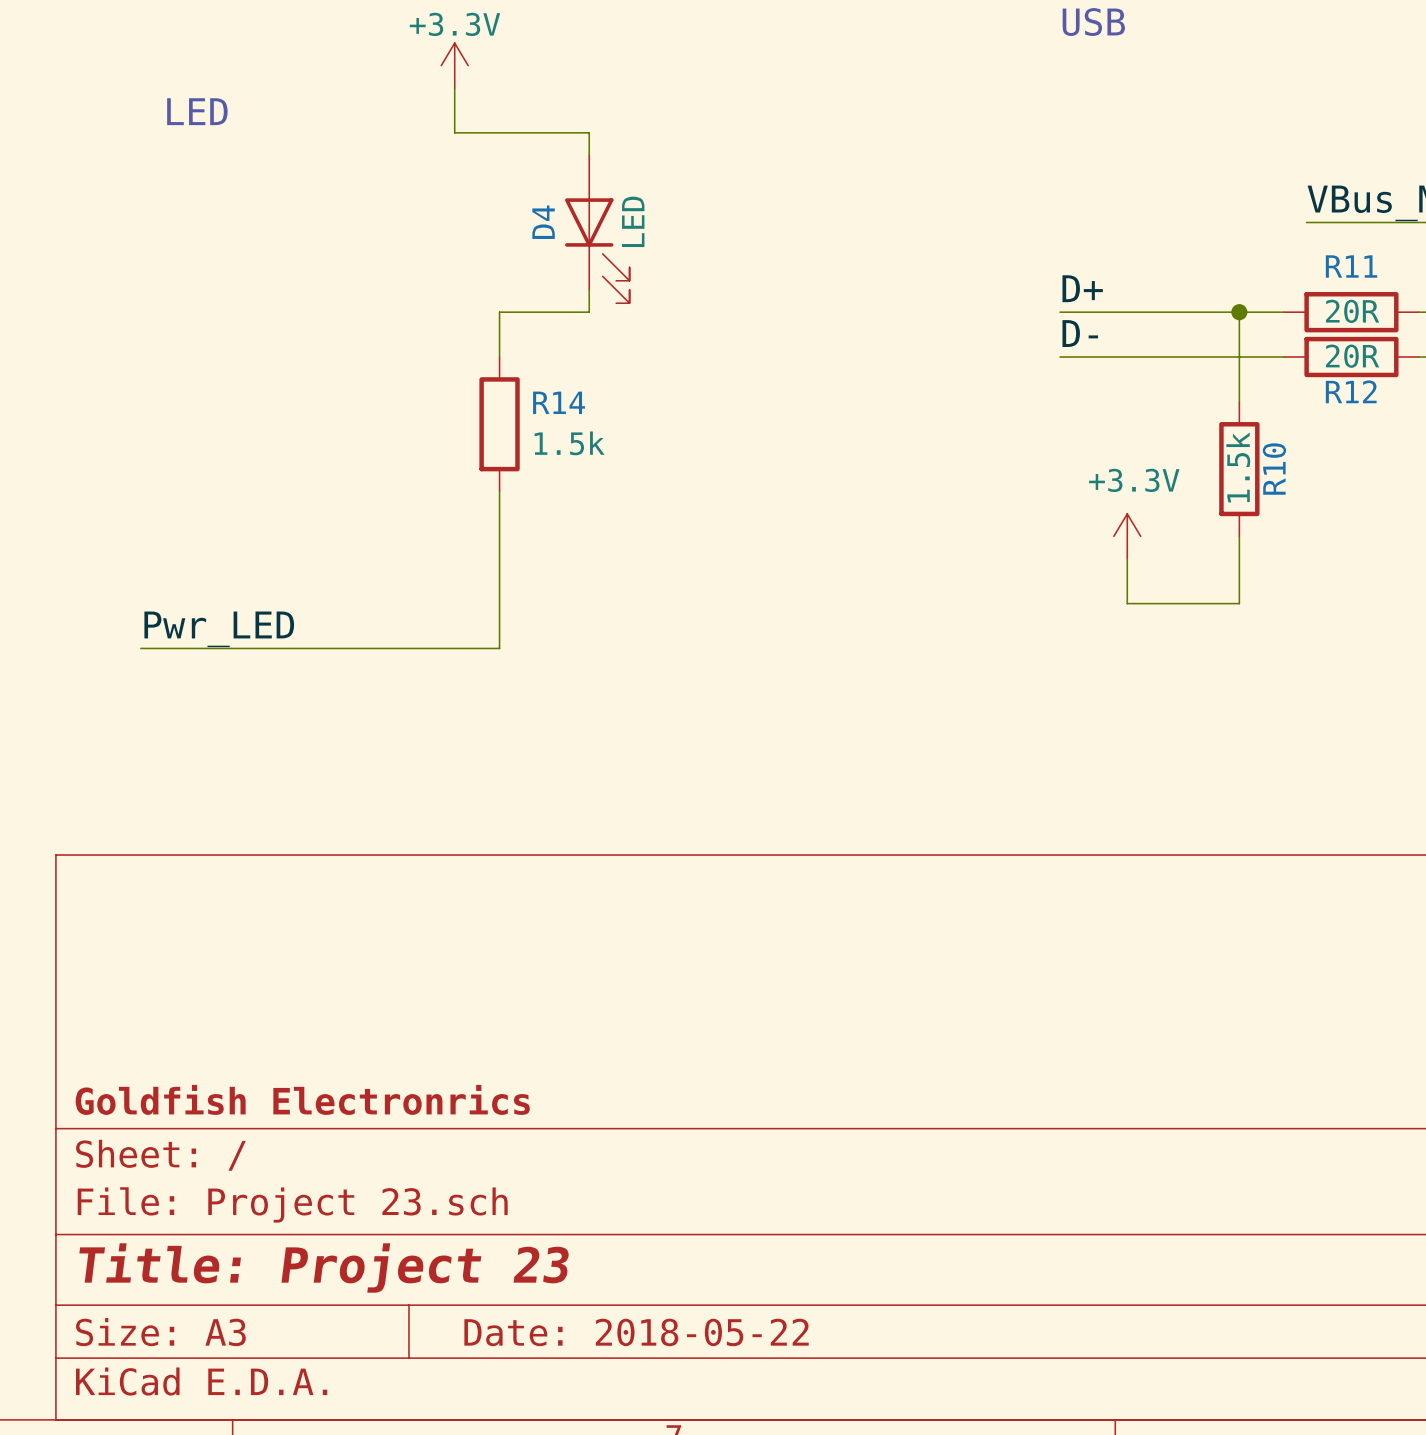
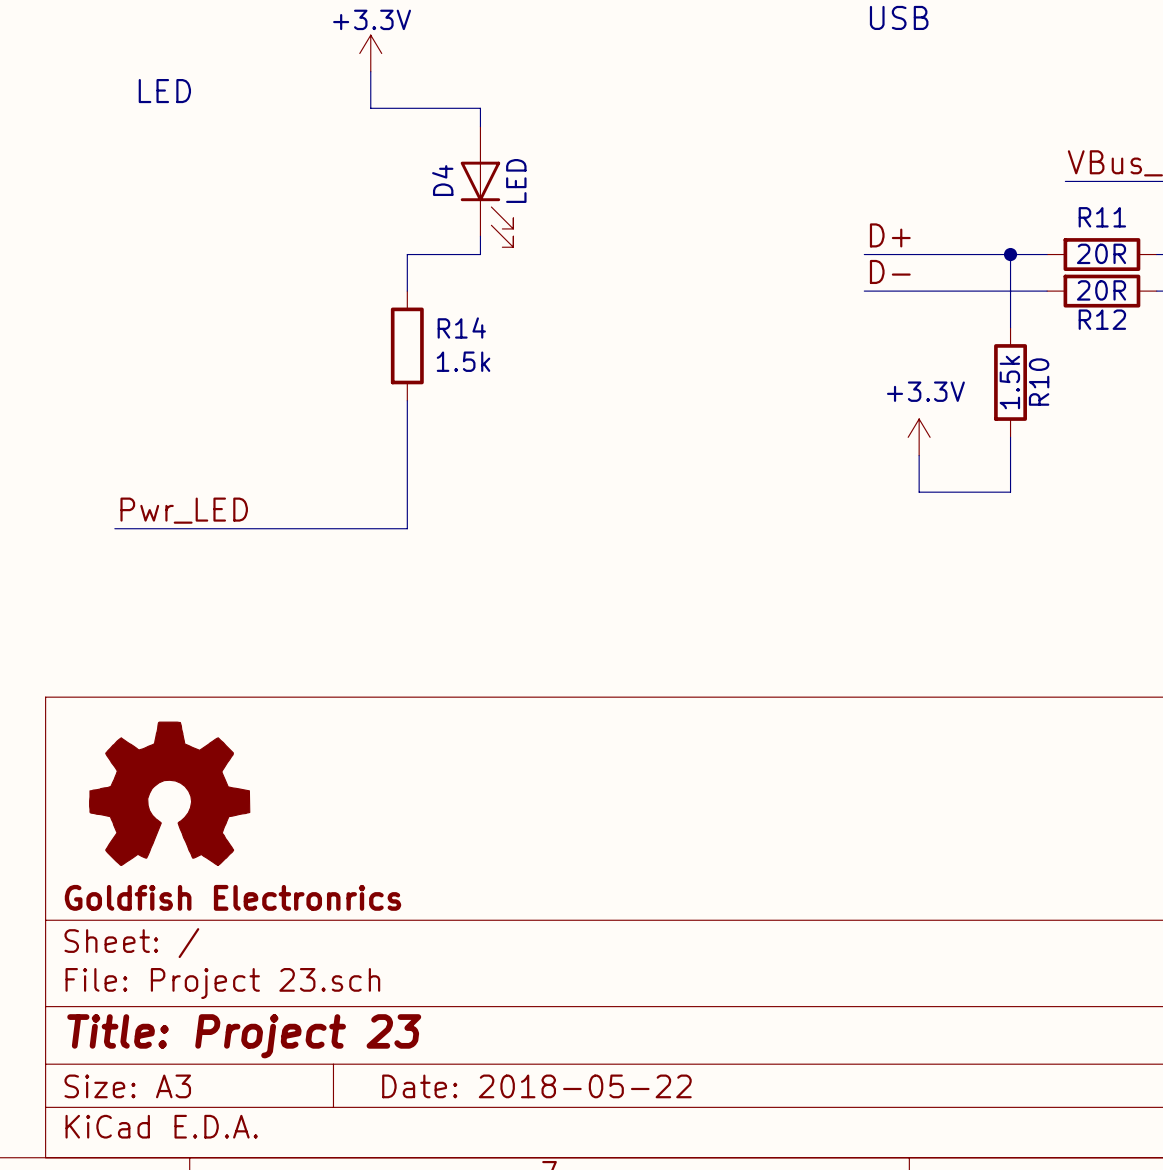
power symbol: none -> (169, 793)

